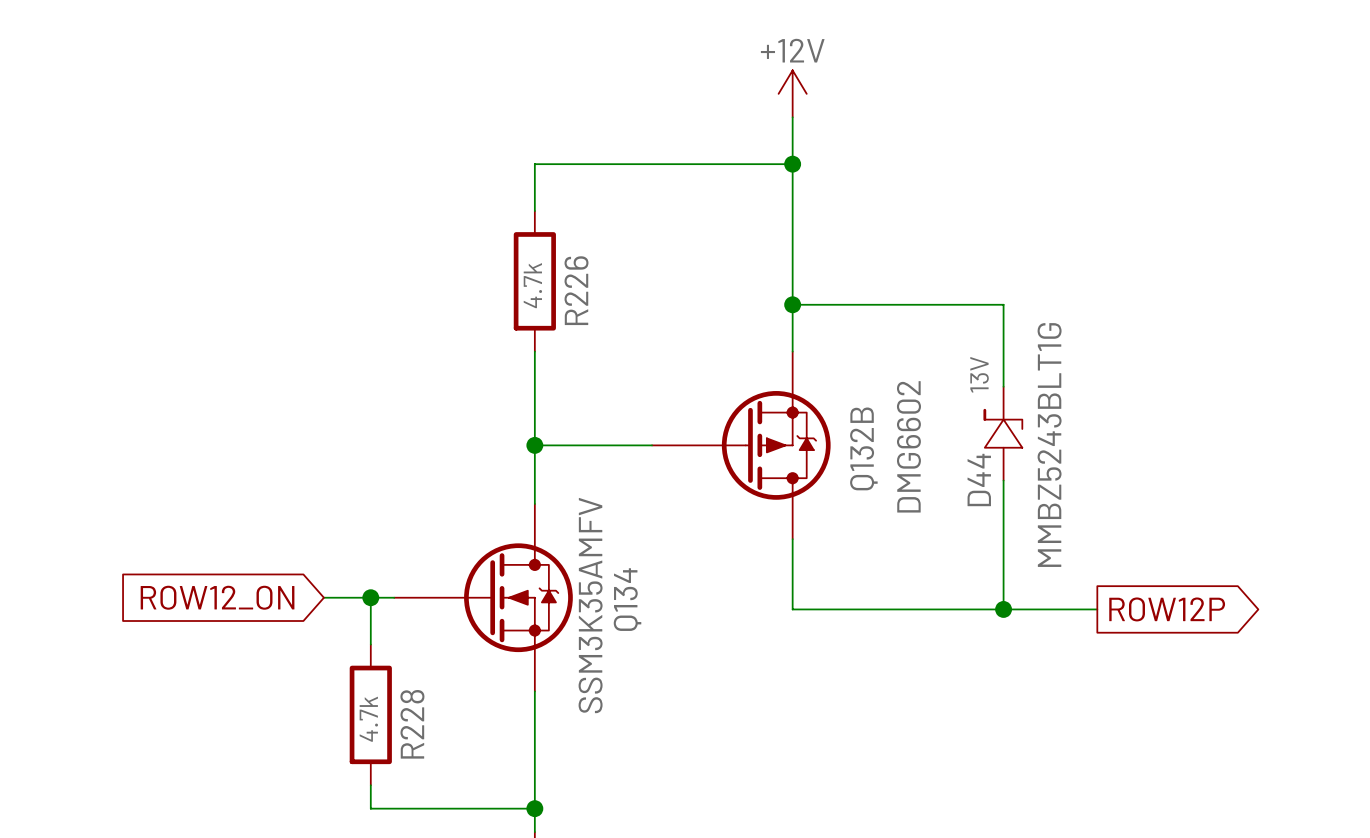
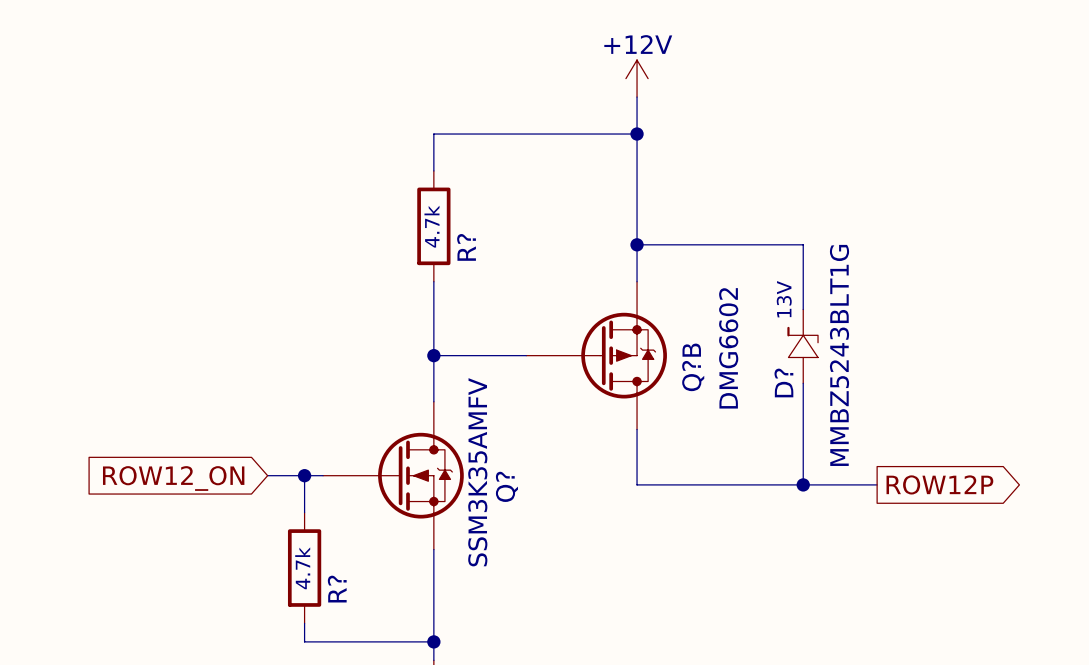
R226 name: R226 (576, 290) -> R? (466, 247)
Q132B name: Q132B (863, 448) -> Q?B (693, 367)
D44 name: D44 (979, 479) -> D? (783, 382)
Q134 name: Q134 (627, 599) -> Q? (506, 486)
R228 name: R228 (412, 724) -> R? (337, 589)

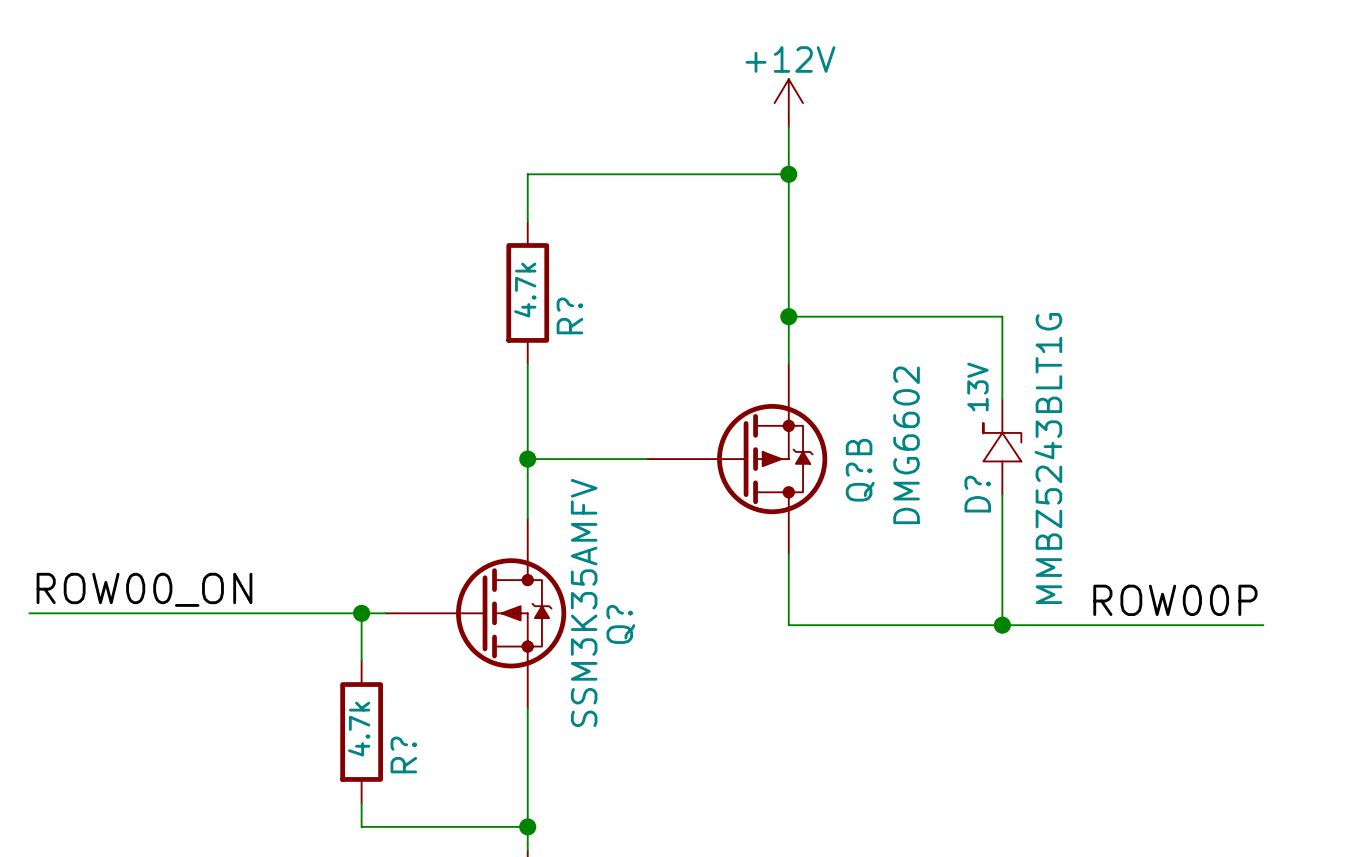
label: none -> ROW00_ON (144, 589)
label: none -> ROW00P (1175, 600)
wire: none -> (29, 613) (314, 613)
global label: ROW12_ON (173, 478) -> none
wire: none -> (1097, 625) (1263, 625)
global label: ROW12P (939, 484) -> none

